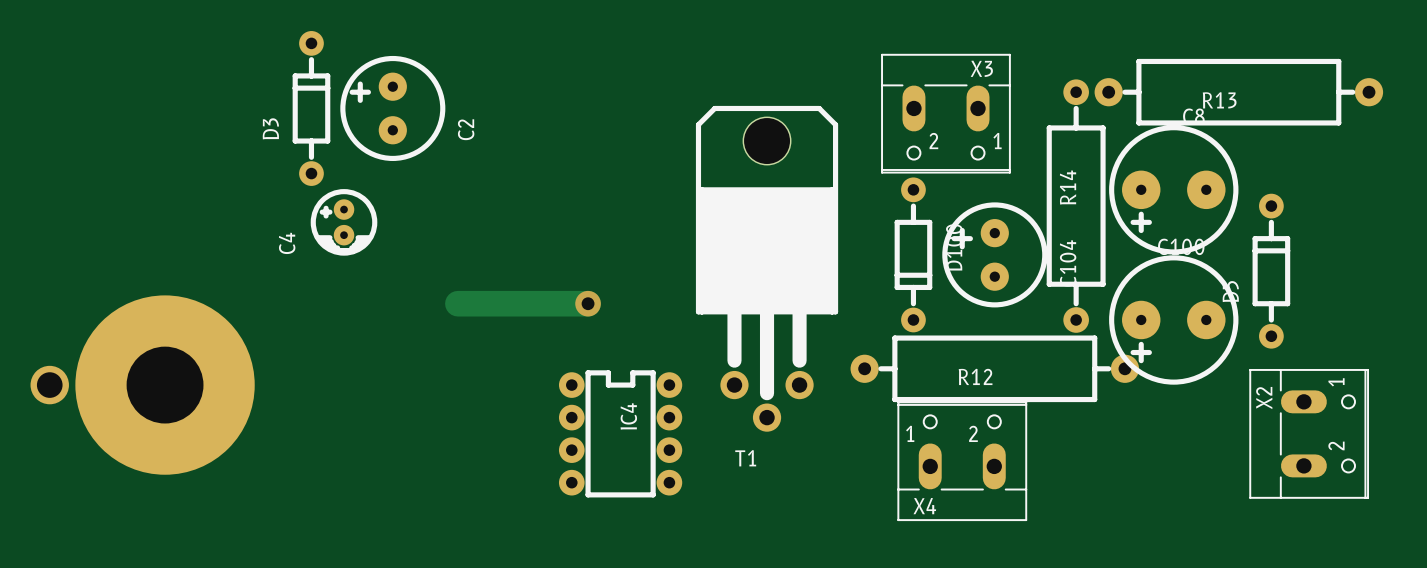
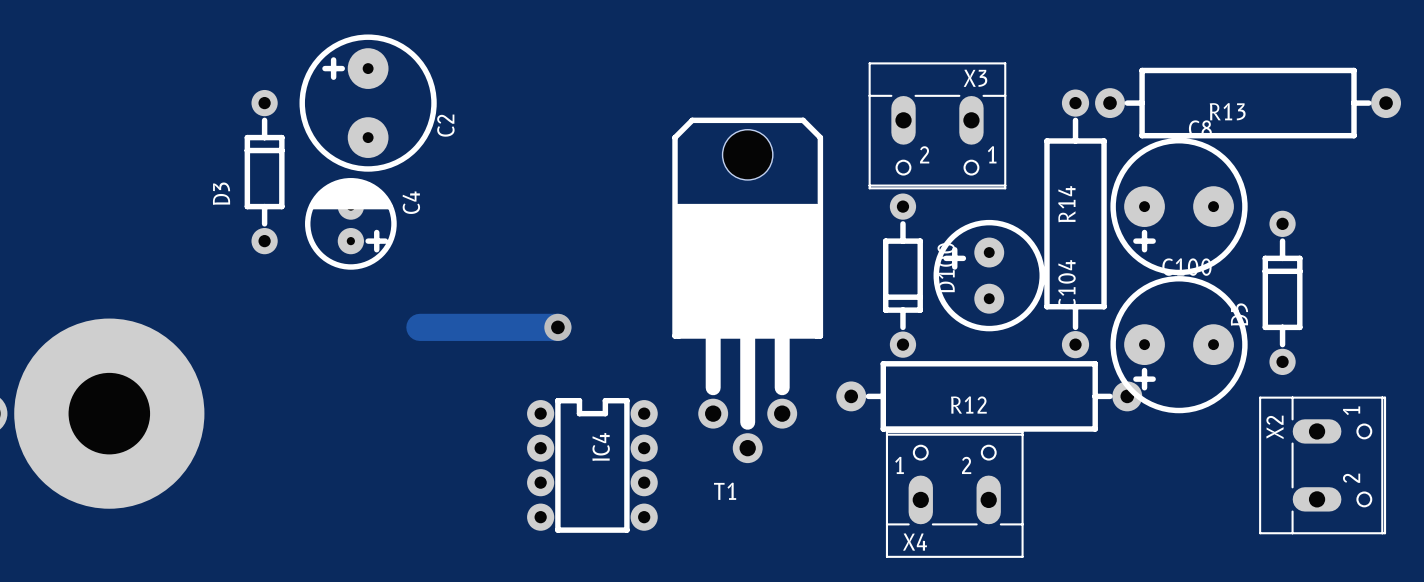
C2 footprint: [340, 55, 446, 162] -> [299, 34, 437, 172]
D3 position: (311, 108) -> (264, 172)
C4 footprint: [310, 189, 378, 256] -> [305, 178, 397, 270]
C4 name position: C4 (287, 243) -> C4 (411, 202)

